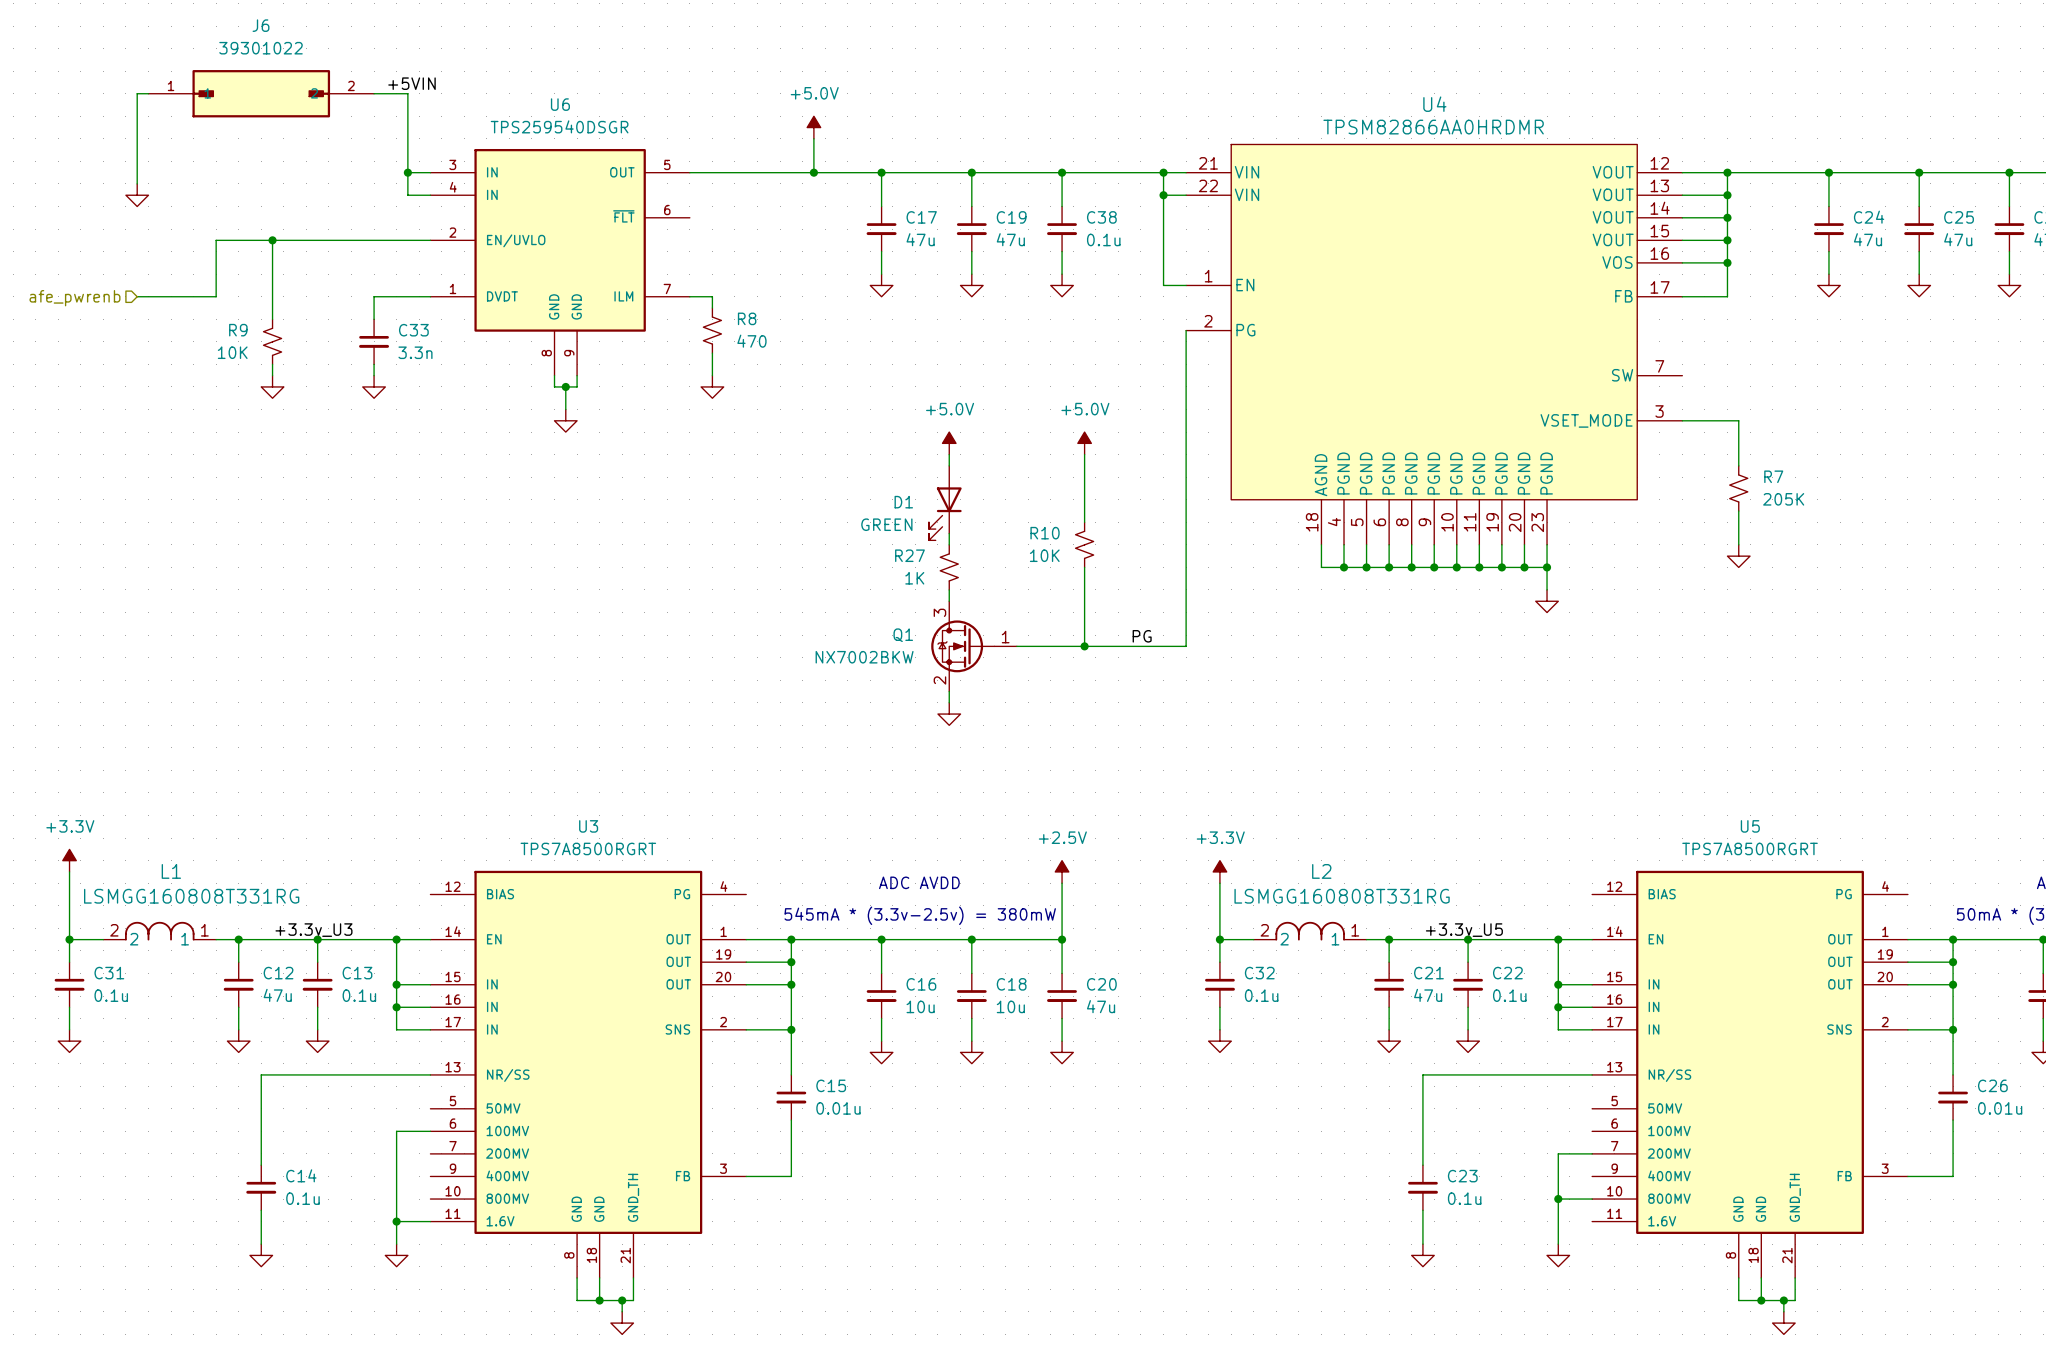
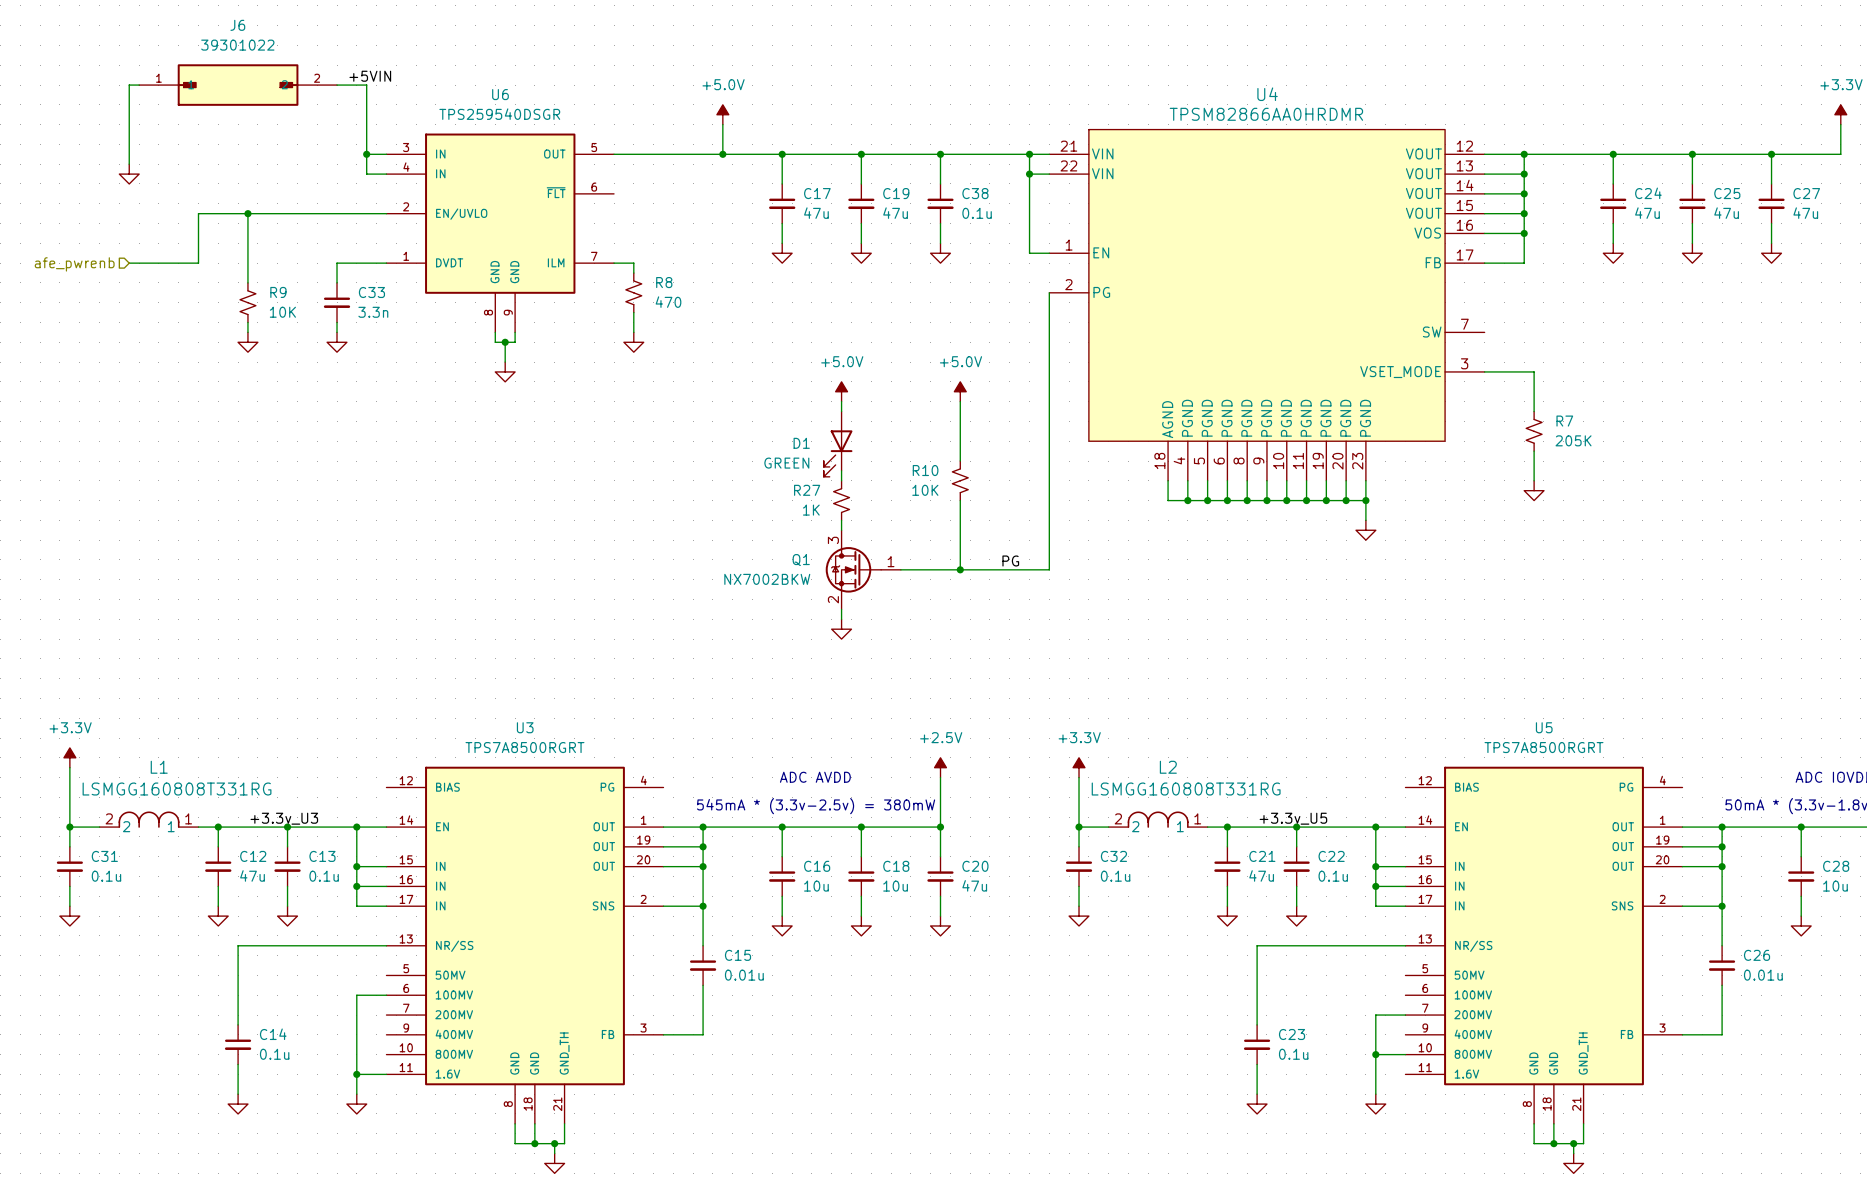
R9 flip: as is (272, 341) -> left-right (247, 302)

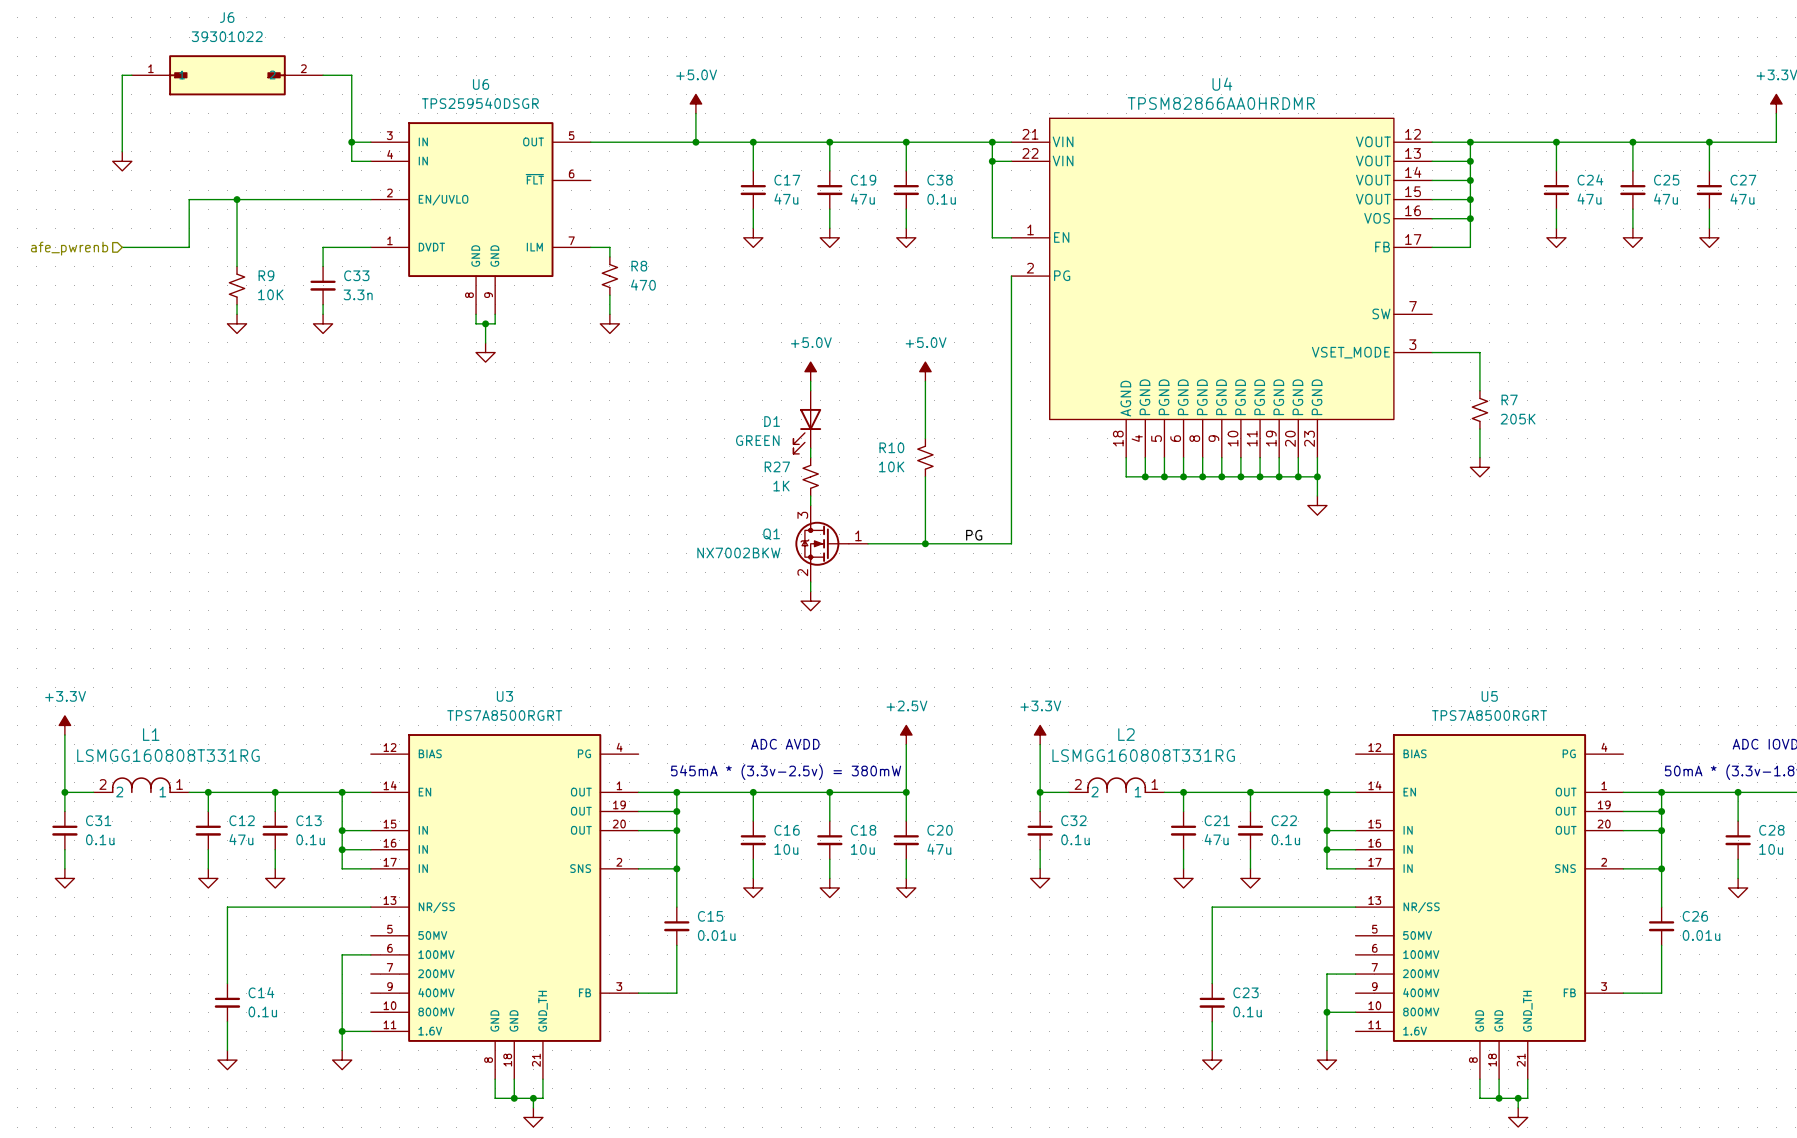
label: +5VIN (370, 76) -> none
label: +3.3v_U3 (284, 818) -> none
label: +3.3v_U5 (1293, 818) -> none

